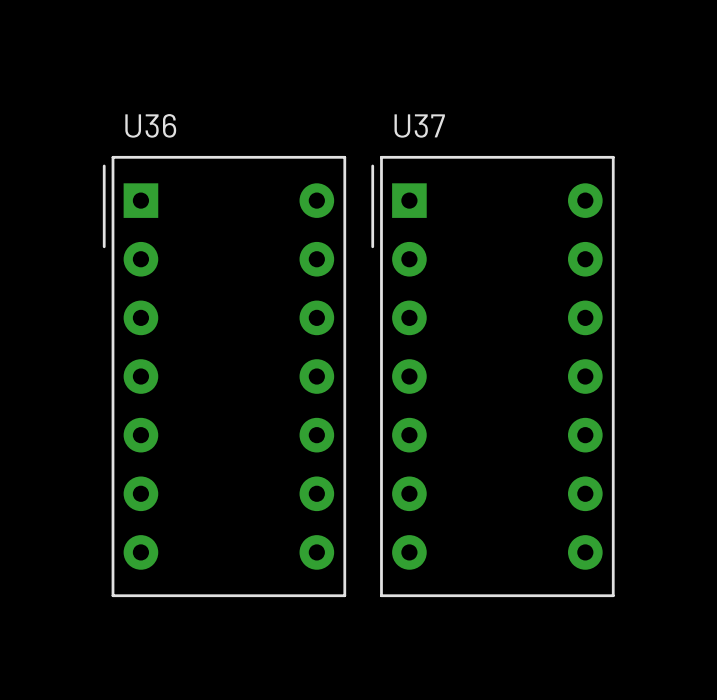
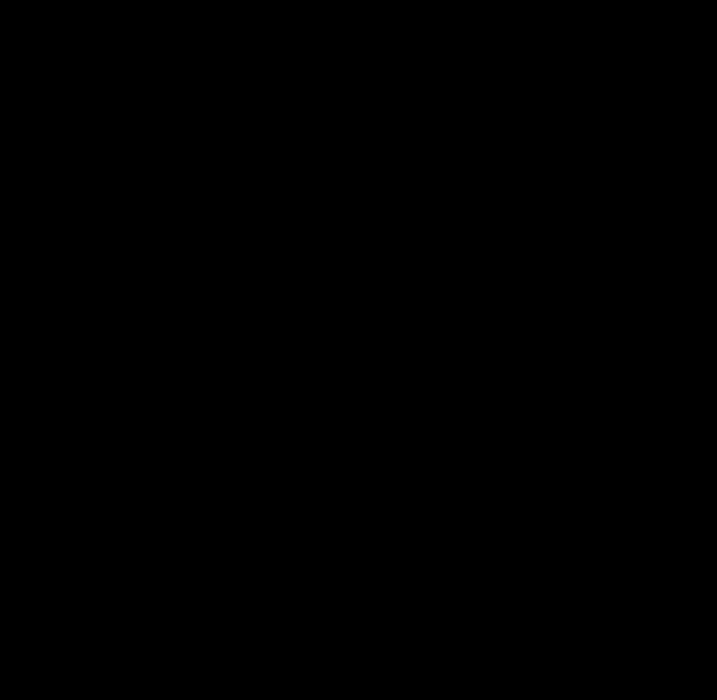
U36: (224, 376) -> none
U37: (492, 376) -> none

